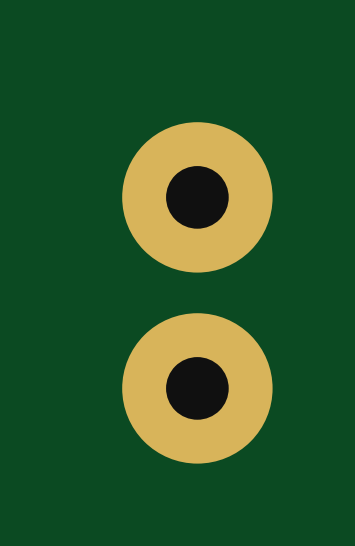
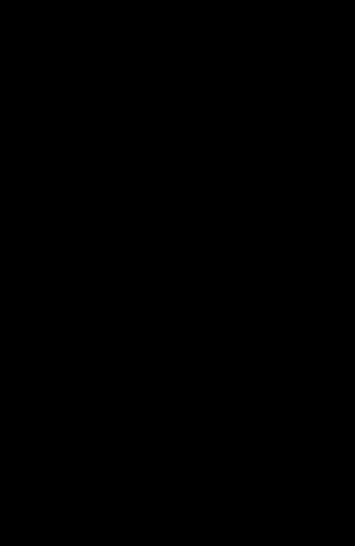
part: (197, 292) -> none

